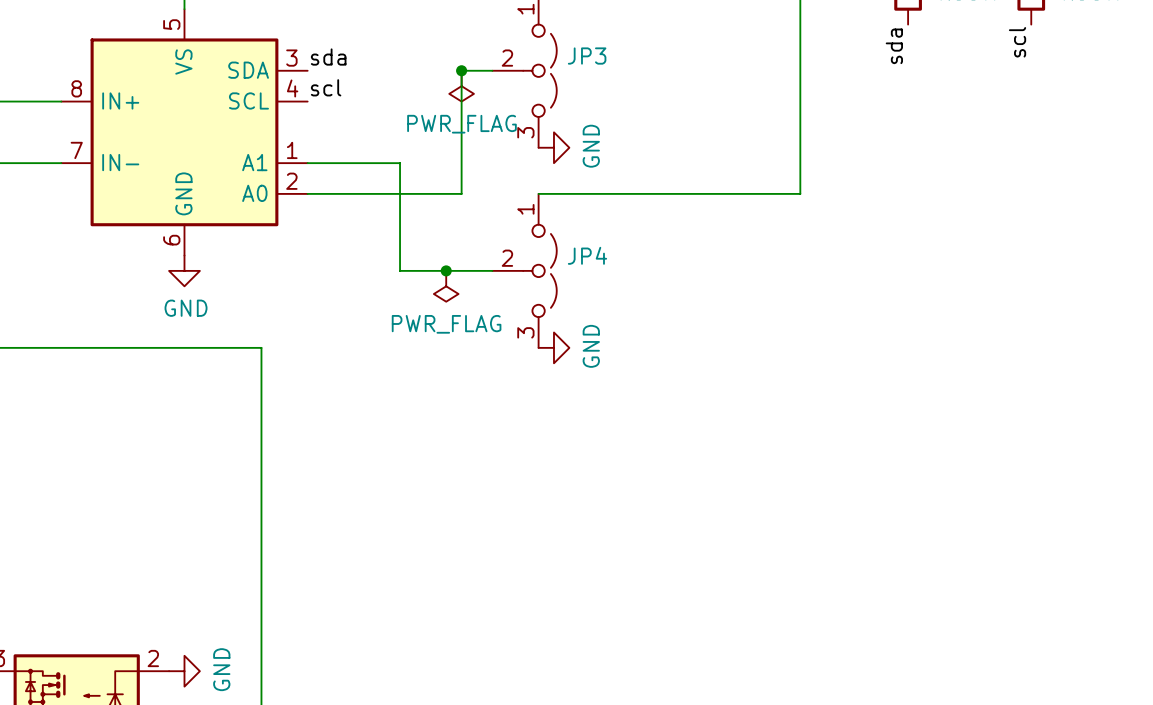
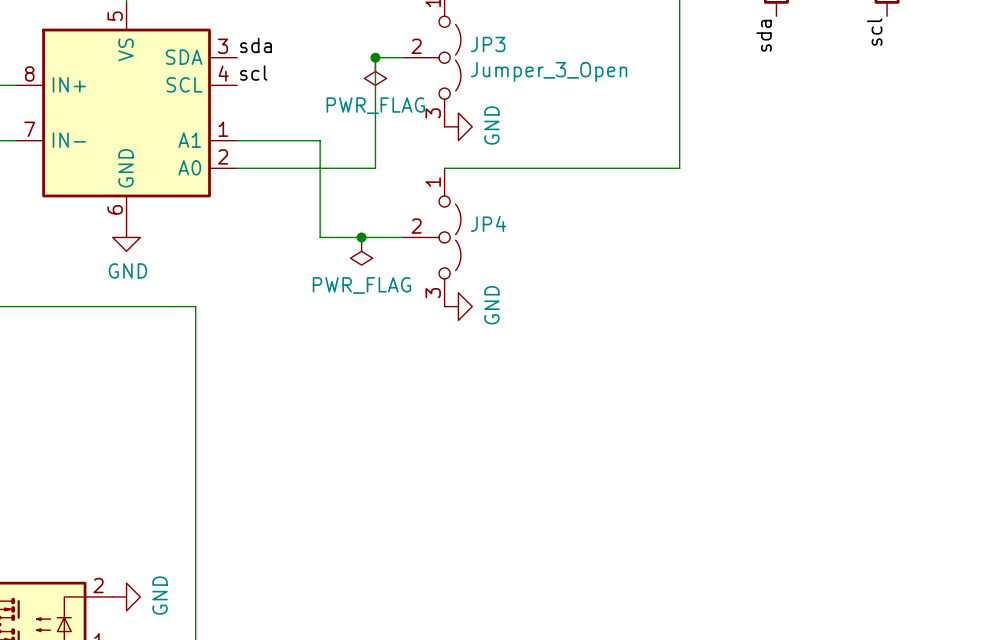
JP3 value: none -> Jumper_3_Open (549, 71)

